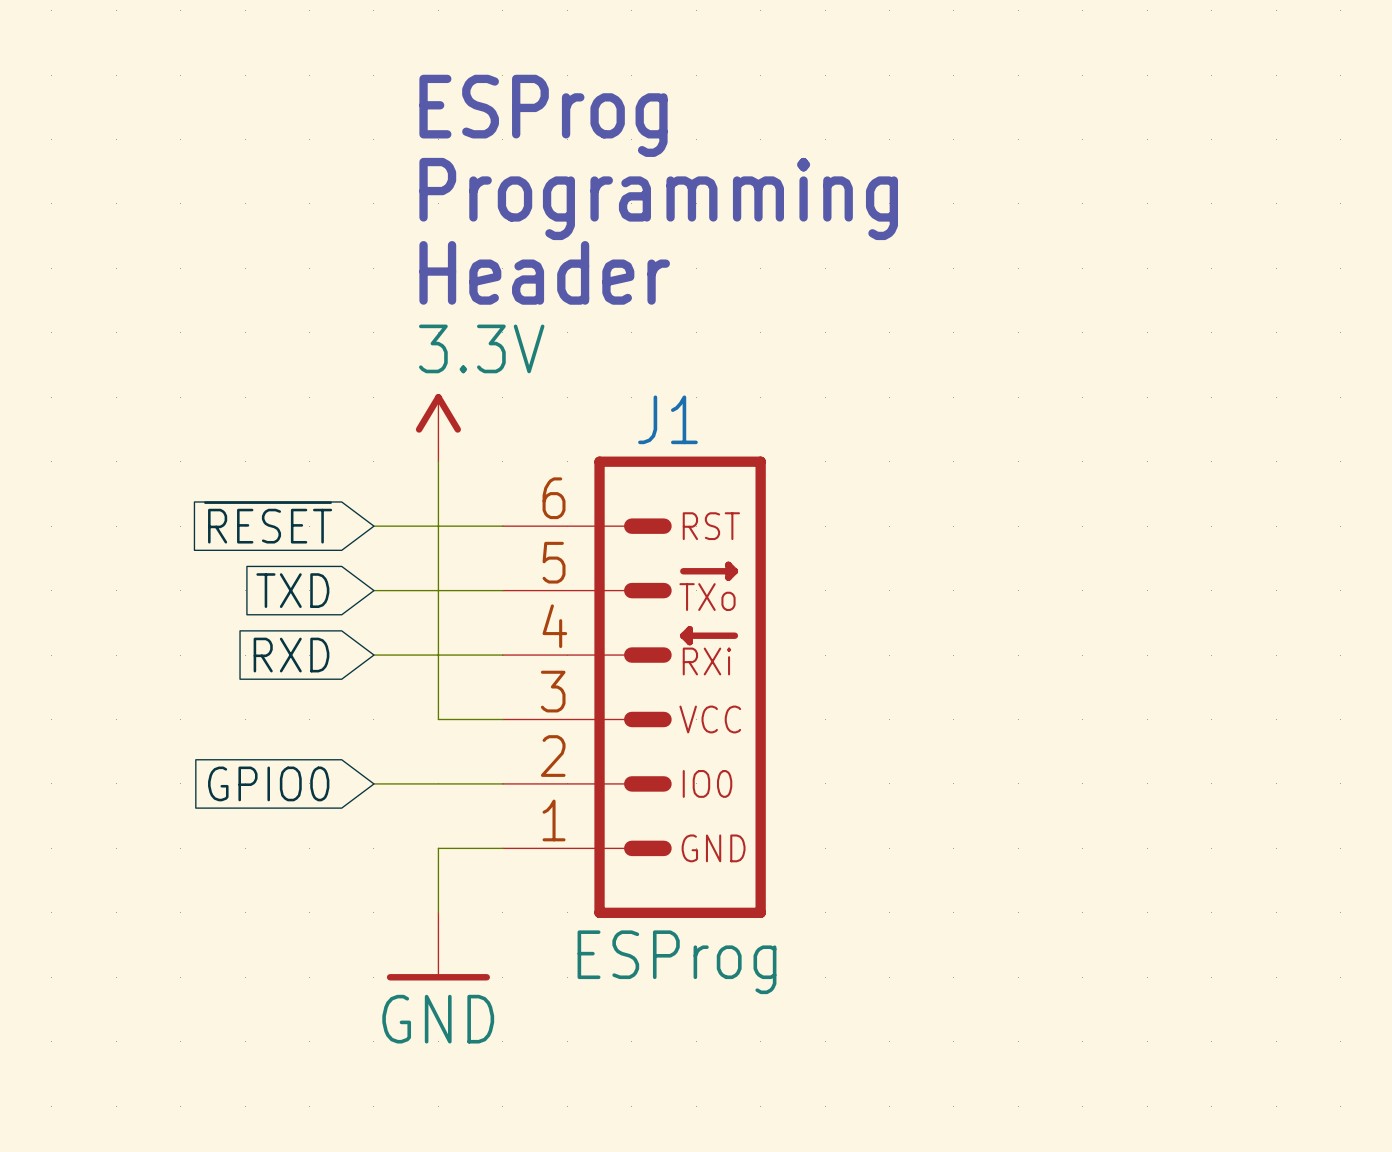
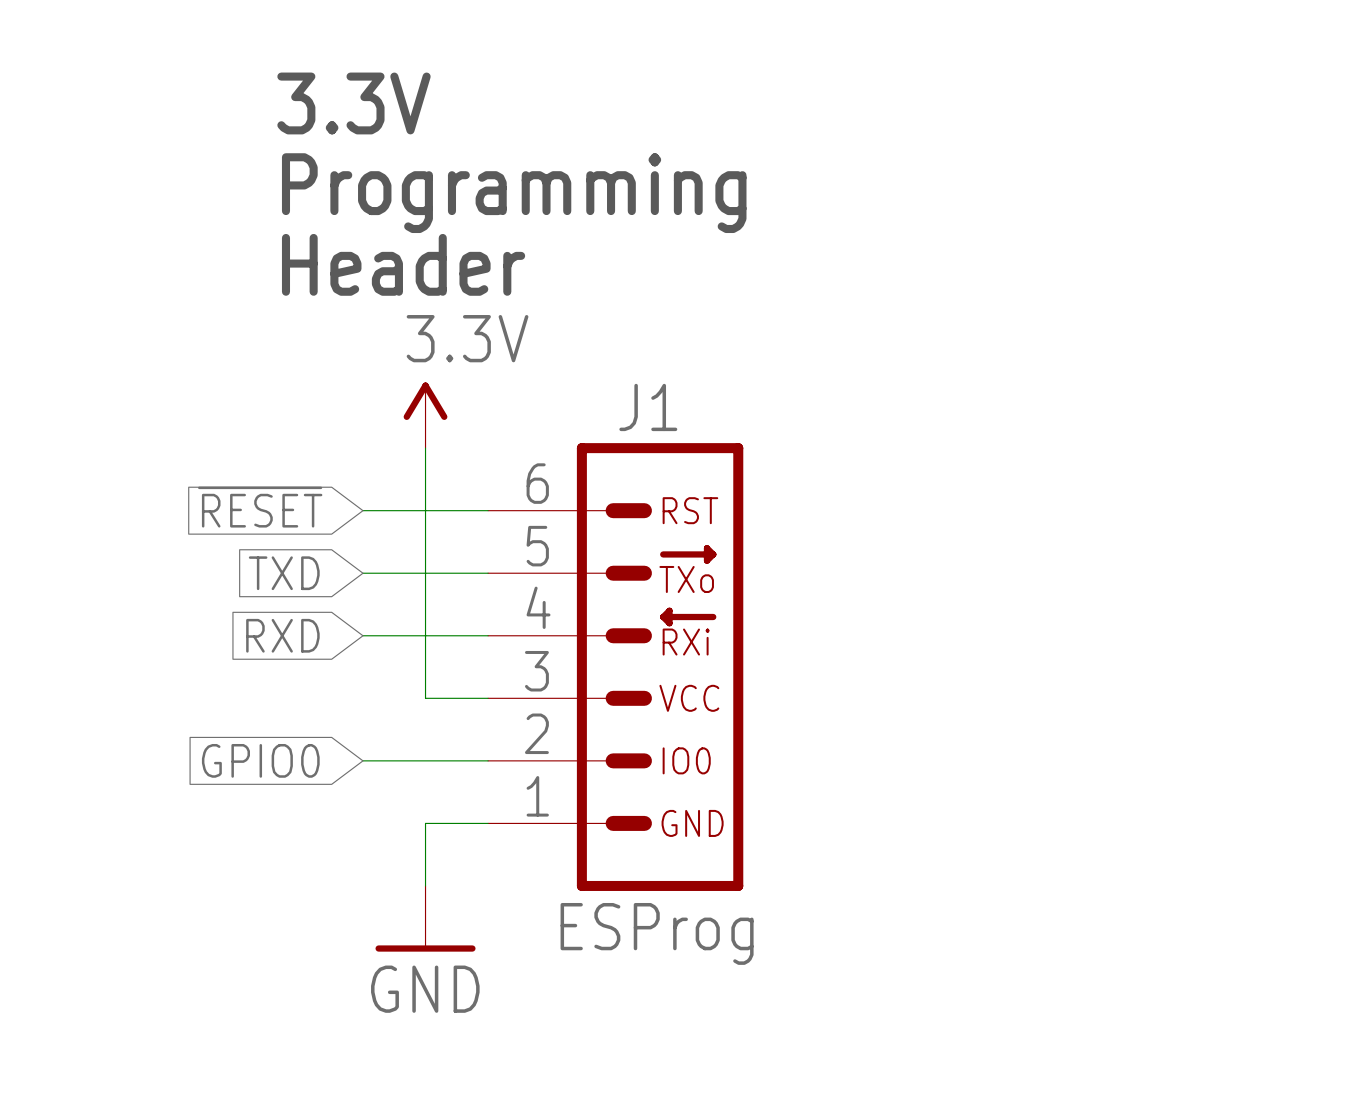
text: none -> 3.3V (353, 103)
text: ESProg (543, 115) -> none
text position: Programming (658, 198) -> Programming (514, 193)
text position: Header (544, 272) -> Header (403, 264)

